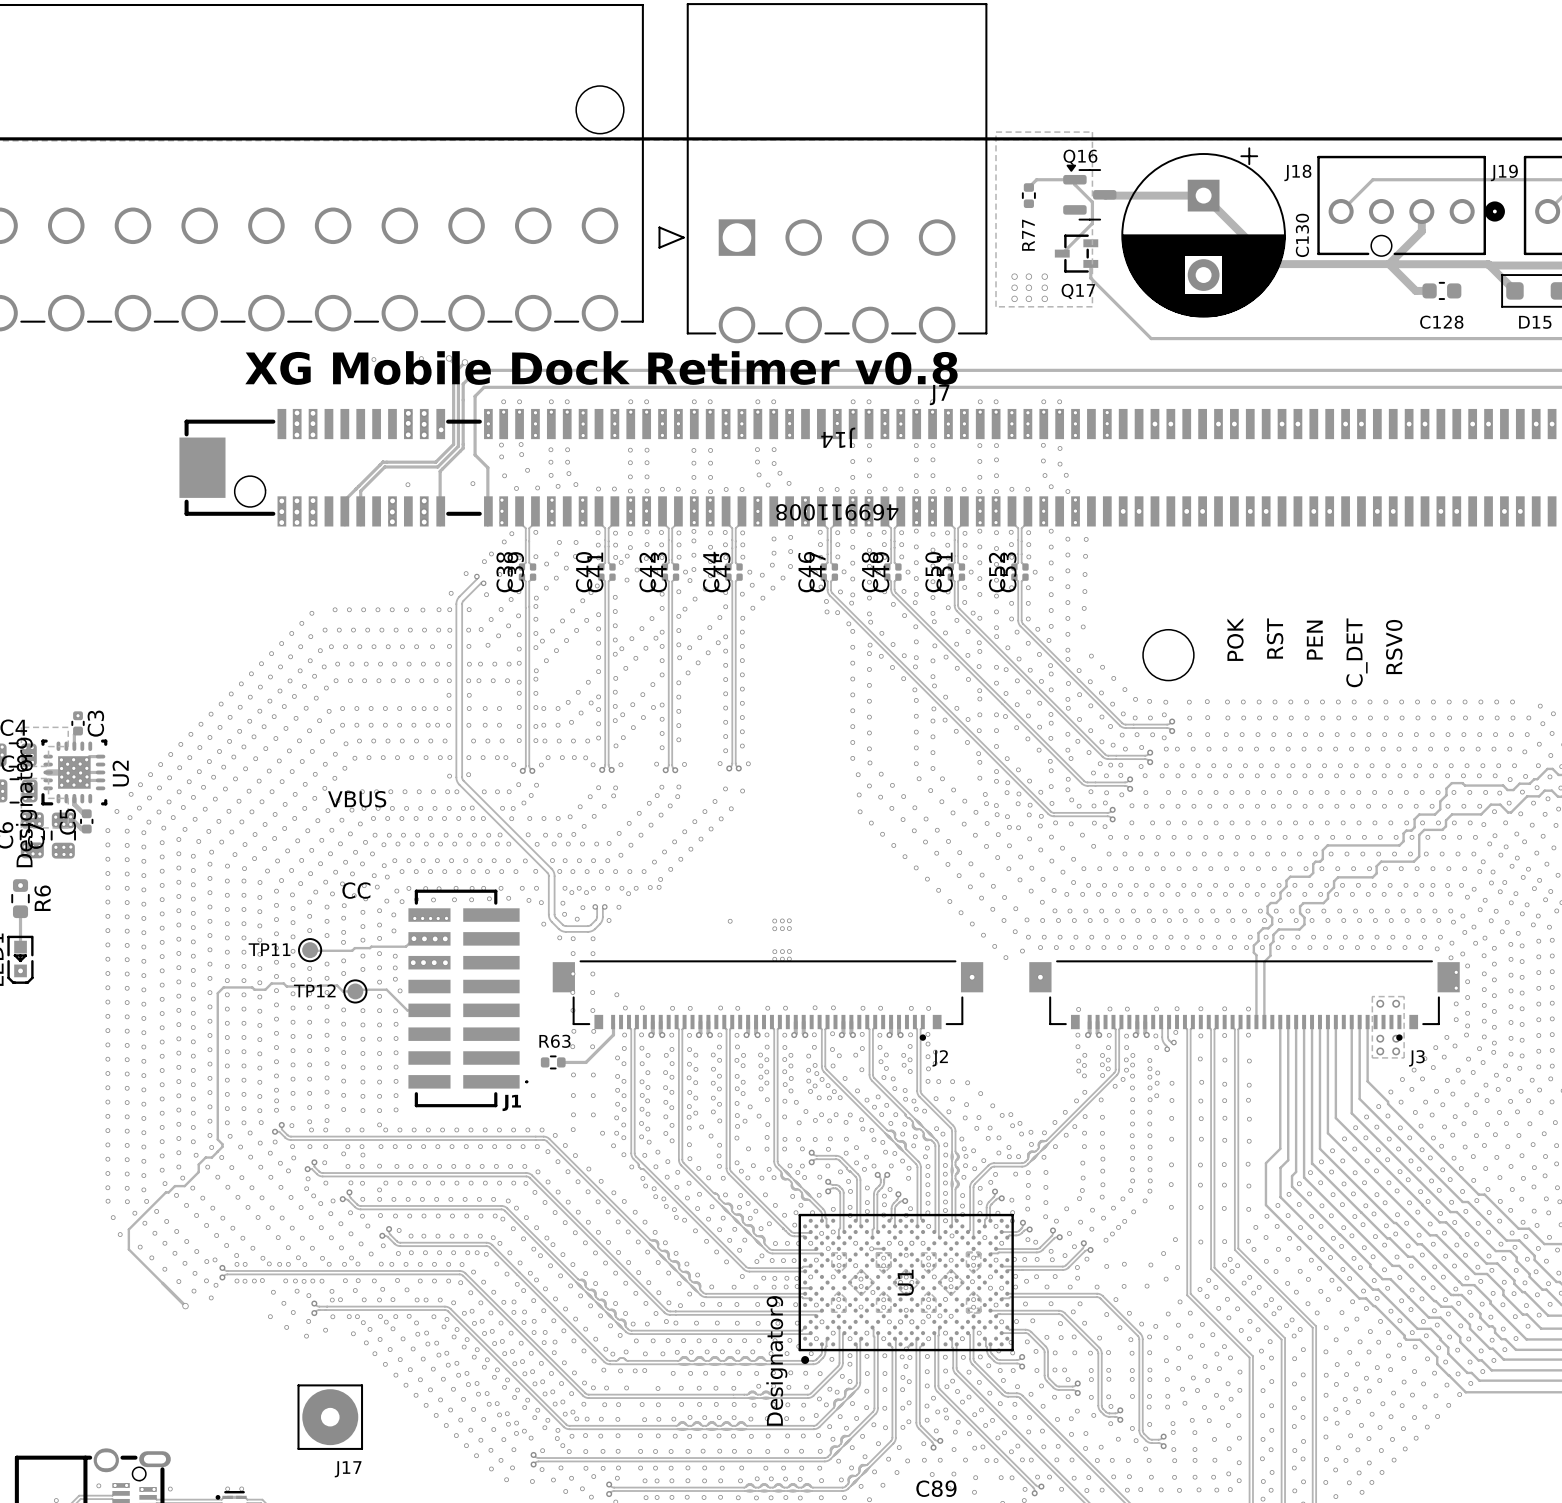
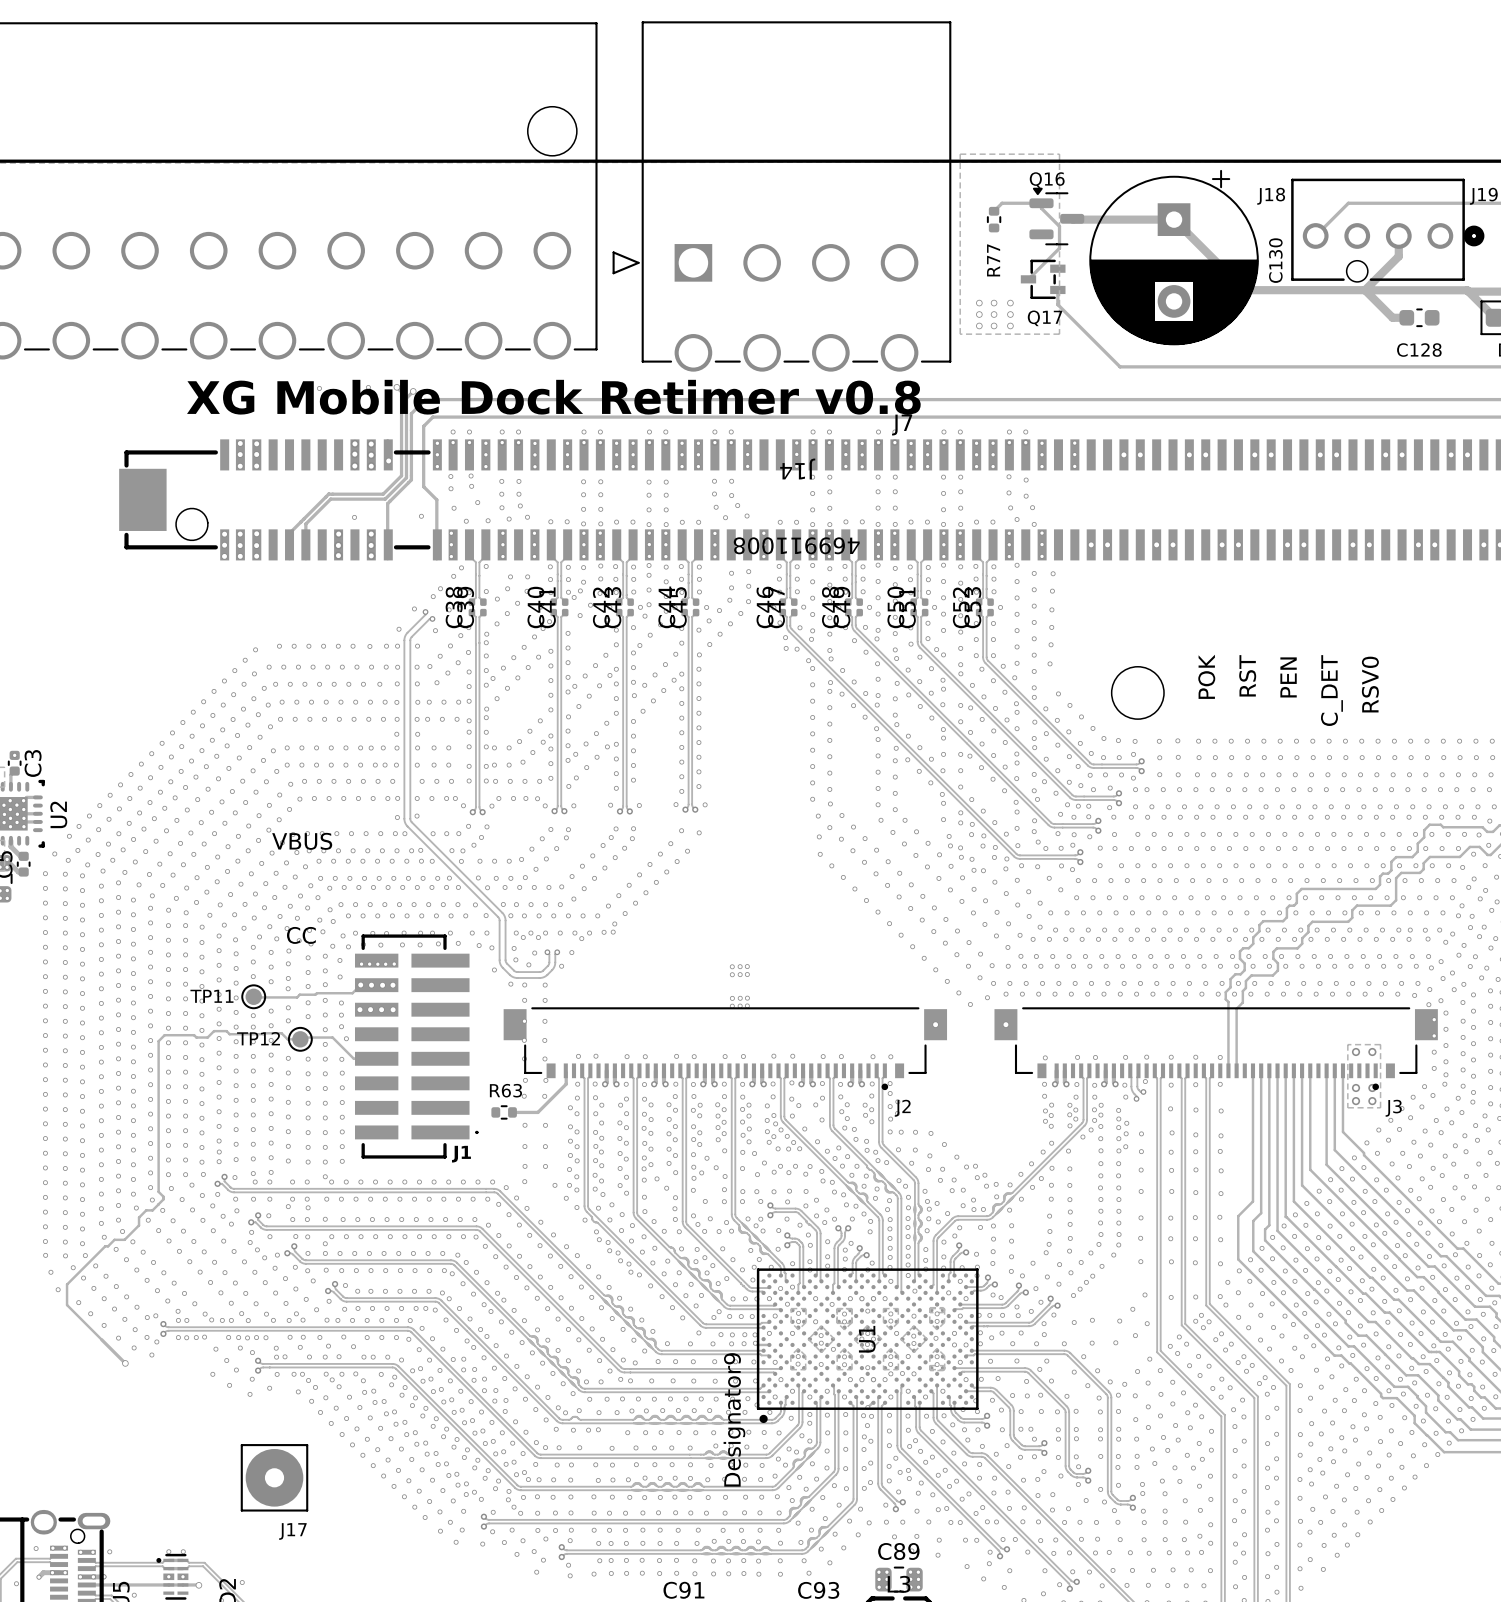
via: (730, 921) -> none
via: (616, 994) -> none
track: (871, 1248) (883, 1248) -> none

